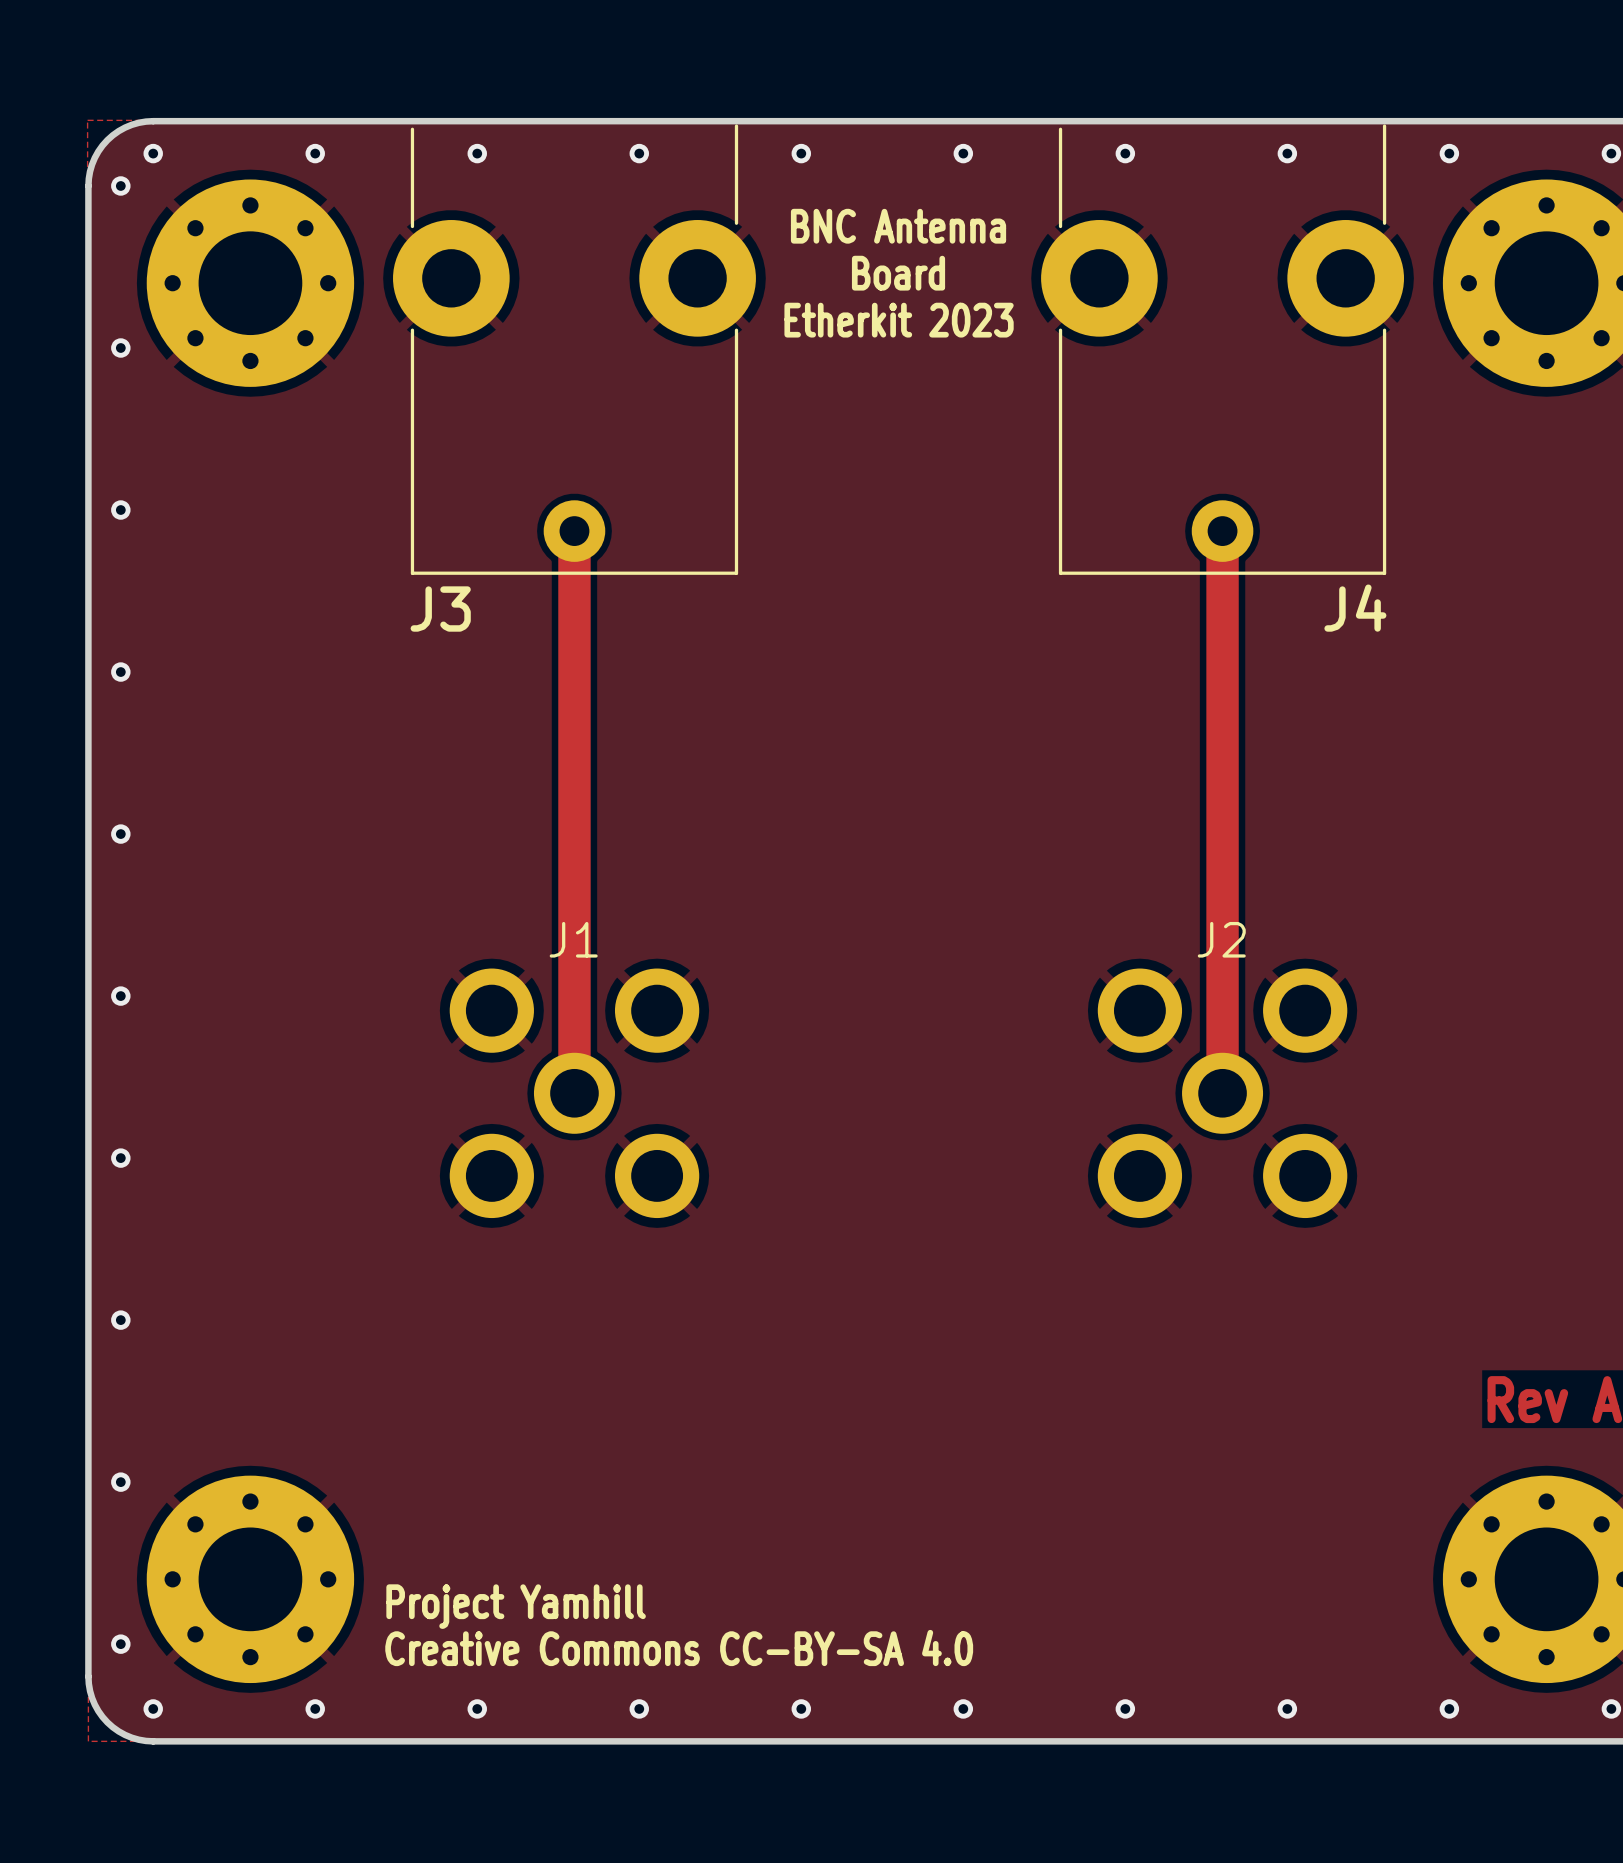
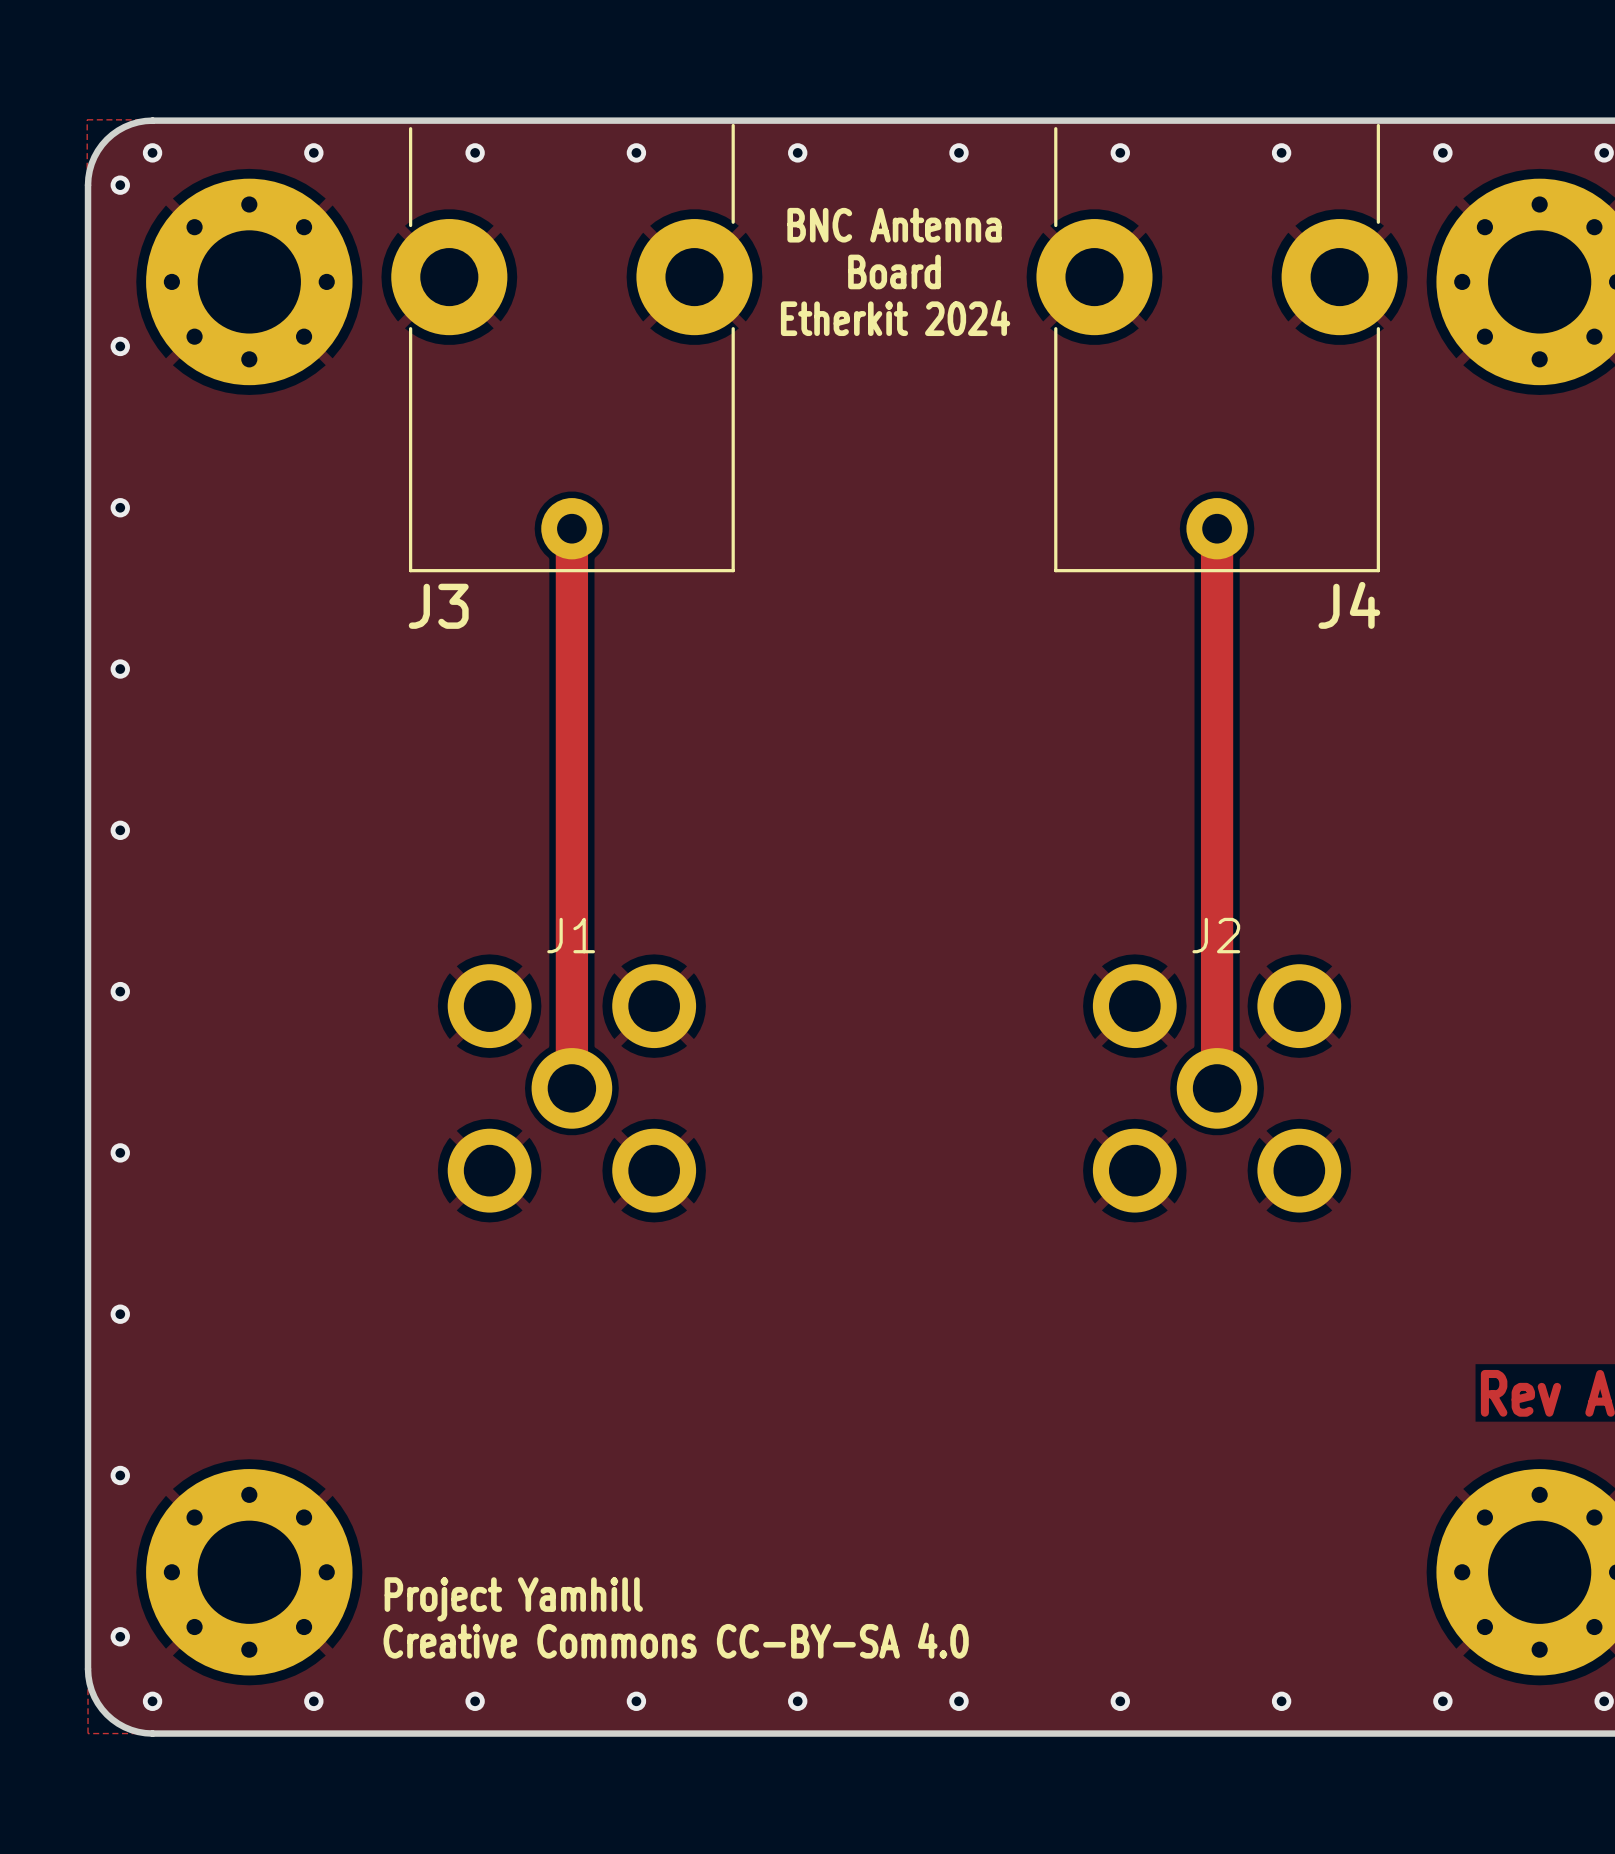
text: Etherkit 2023 (899, 320) -> Etherkit 2024 (895, 318)

